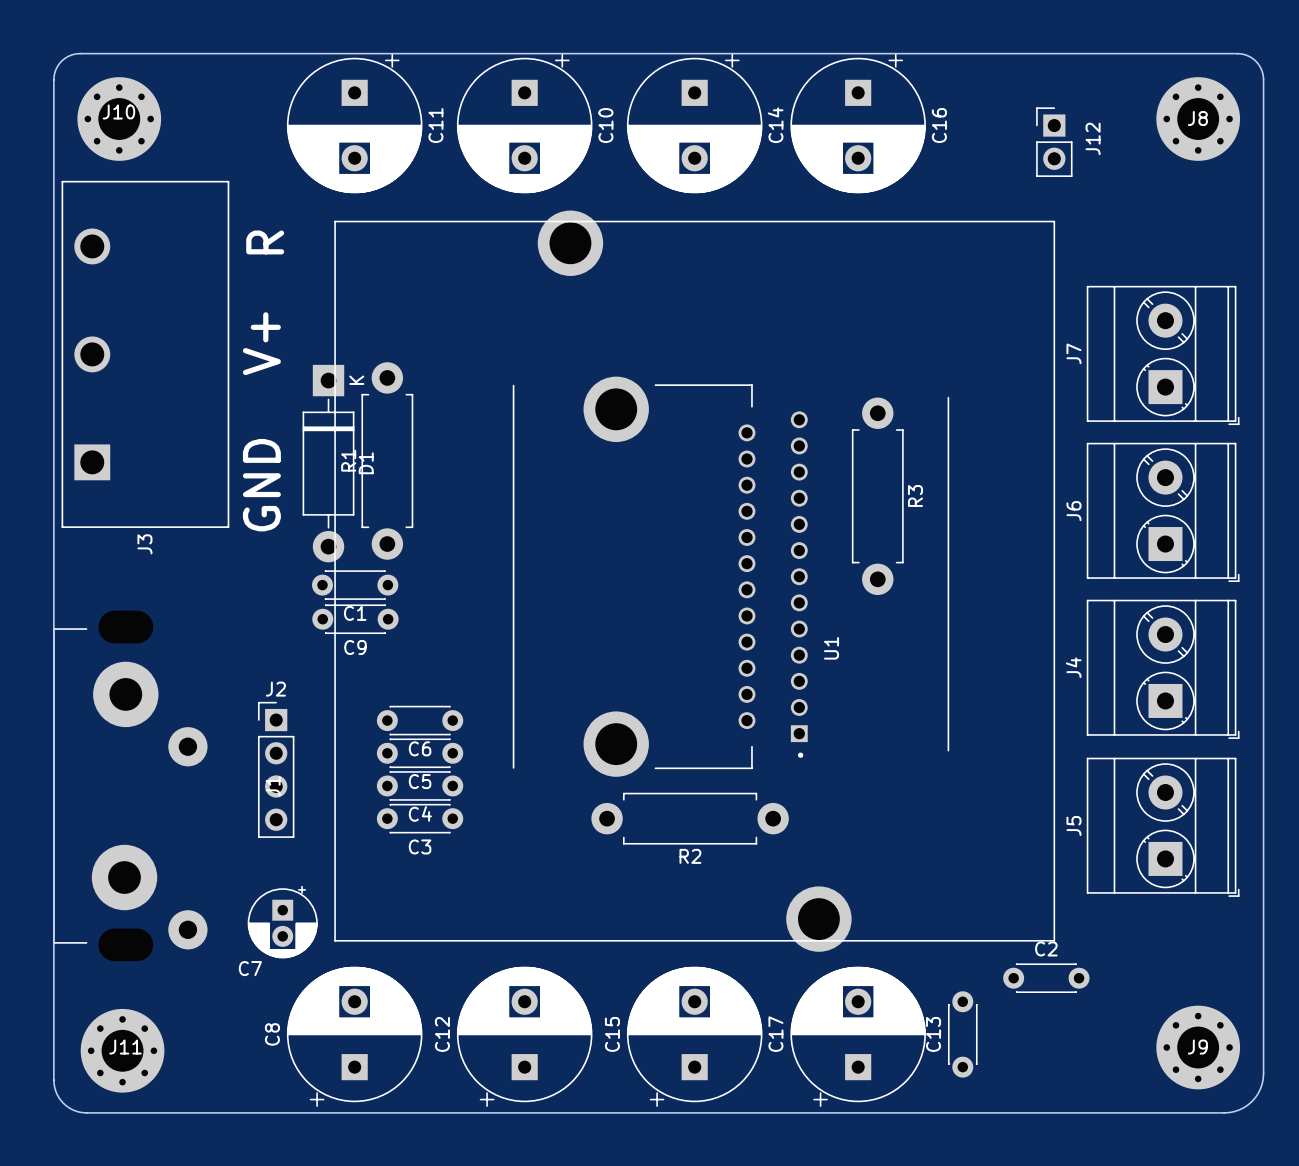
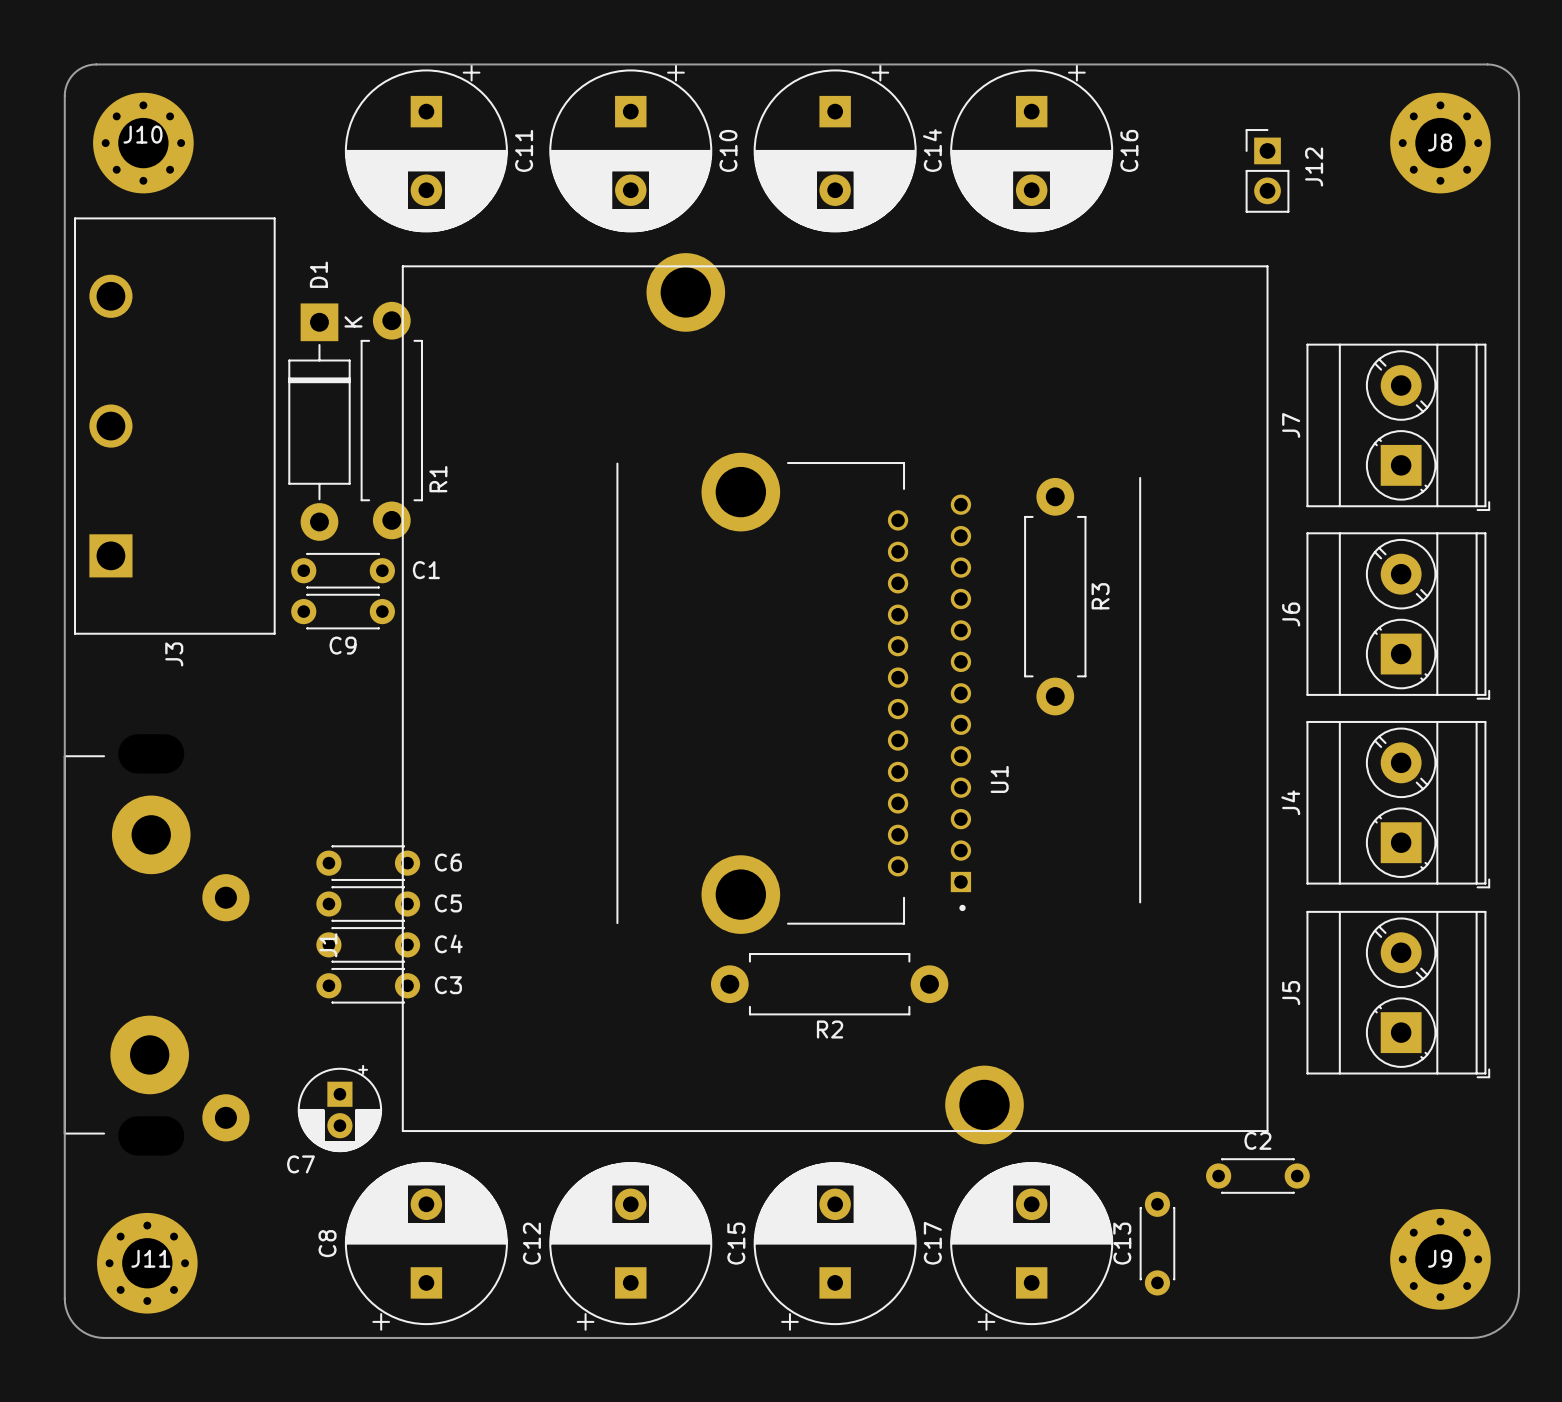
text: R (265, 242) -> none
text: V+ (261, 343) -> none
R1 name position: R1 (348, 460) -> R1 (438, 479)
R1 position: (387, 460) -> (391, 420)
D1 position: (328, 463) -> (319, 422)
D1 name position: D1 (366, 463) -> D1 (318, 274)
text: GND (261, 485) -> none
C1 position: (355, 585) -> (343, 570)
C1 name position: C1 (355, 613) -> C1 (426, 570)
C9 position: (355, 619) -> (343, 611)
C6 position: (420, 720) -> (368, 863)
C6 name position: C6 (420, 748) -> C6 (448, 862)
C5 position: (420, 753) -> (368, 904)
J2: (276, 769) -> none
C5 name position: C5 (420, 781) -> C5 (448, 903)
C4 position: (420, 785) -> (368, 944)
C4 name position: C4 (420, 813) -> C4 (448, 943)
C3 position: (420, 818) -> (368, 985)
C3 name position: C3 (420, 846) -> C3 (448, 985)

